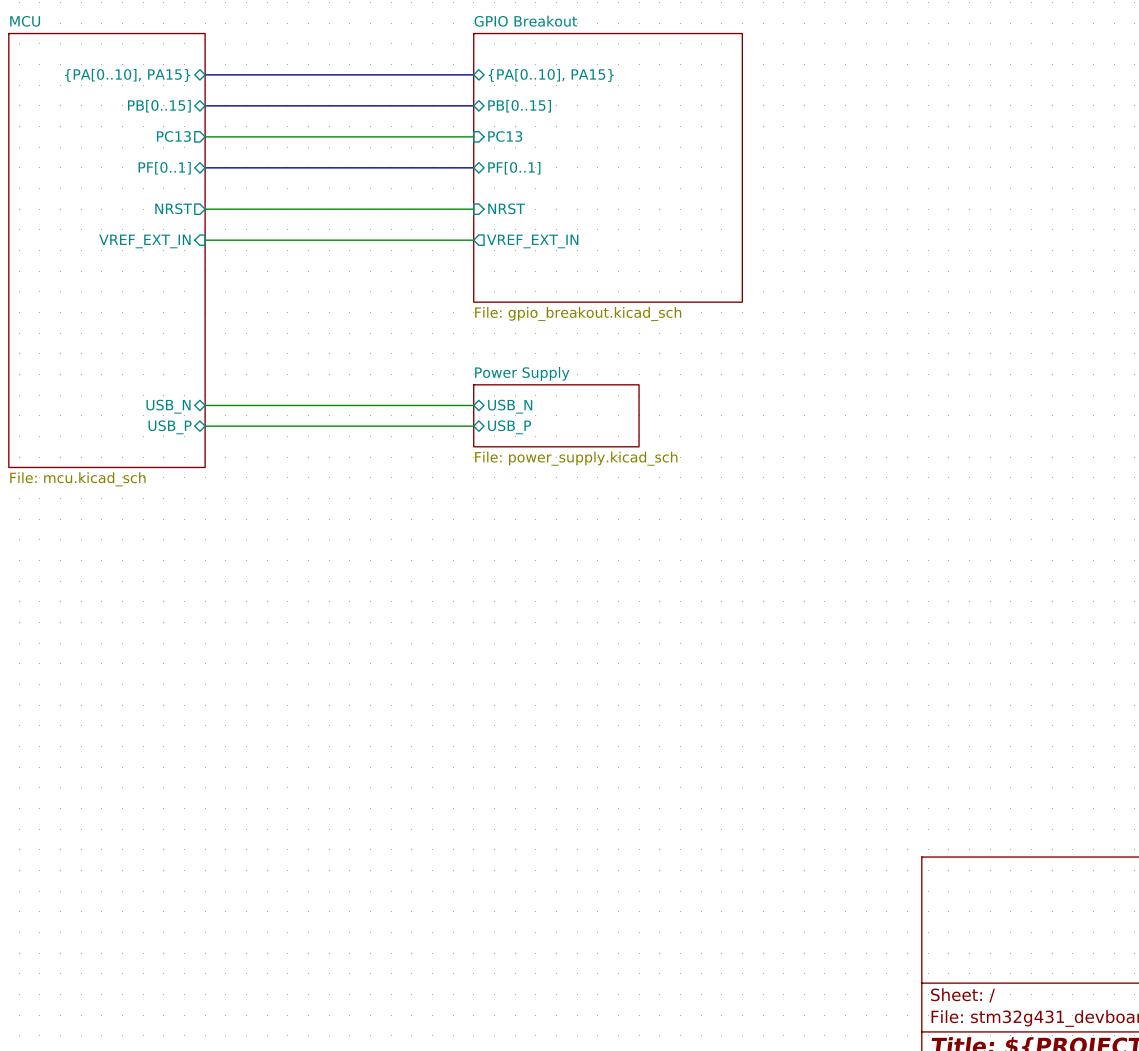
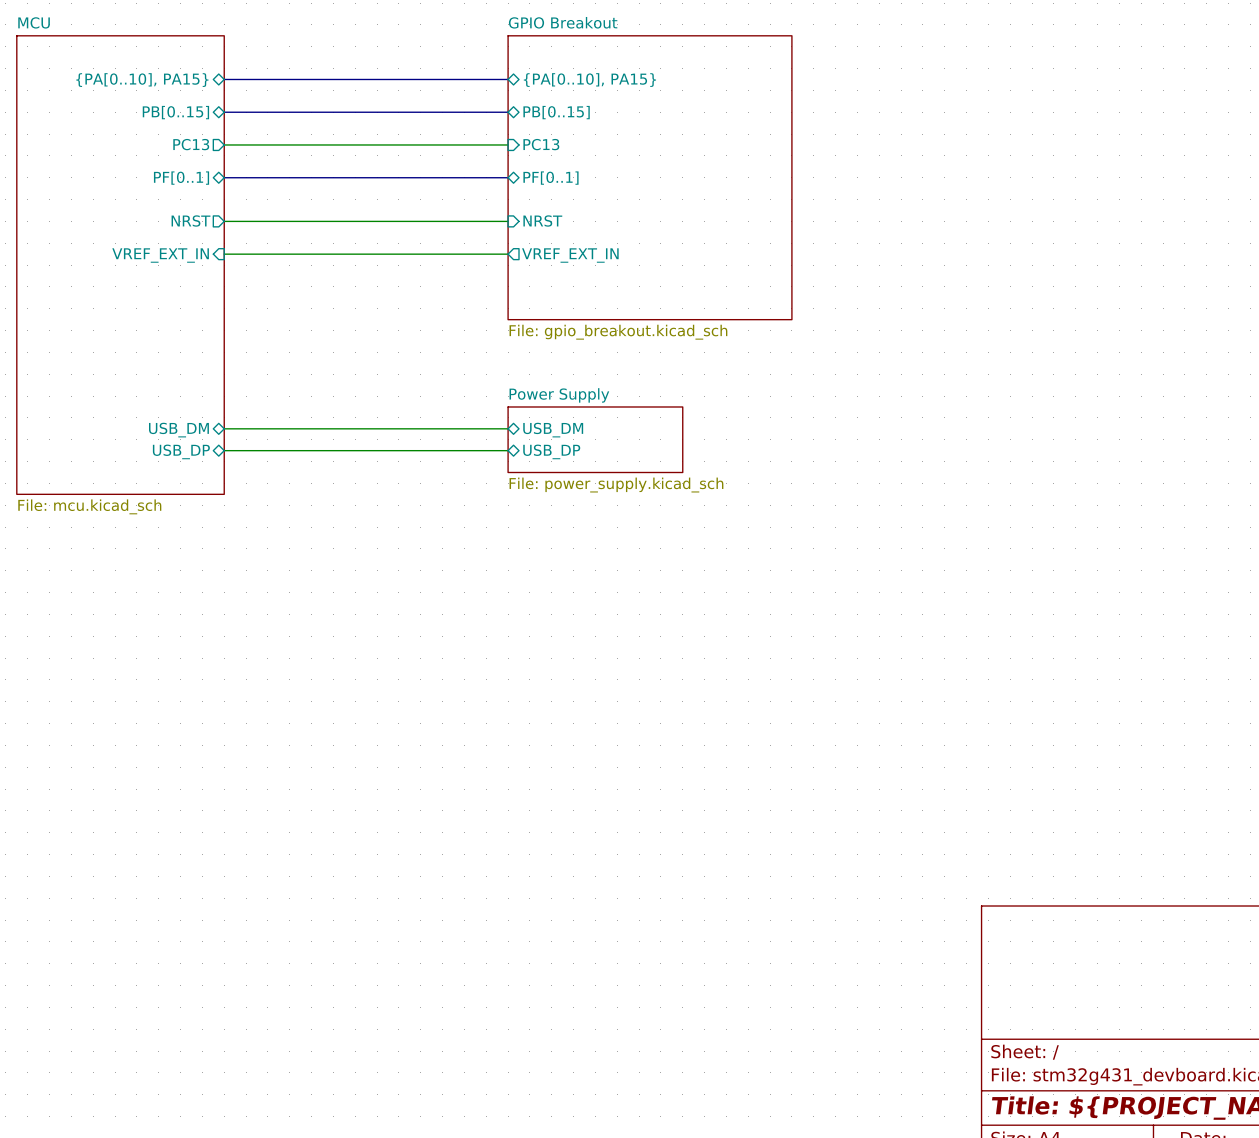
sheet pin: USB_N (168, 406) -> USB_DM (178, 430)
sheet pin: USB_N (510, 406) -> USB_DM (553, 430)
sheet pin: USB_P (170, 427) -> USB_DP (181, 451)
sheet pin: USB_P (509, 427) -> USB_DP (551, 451)

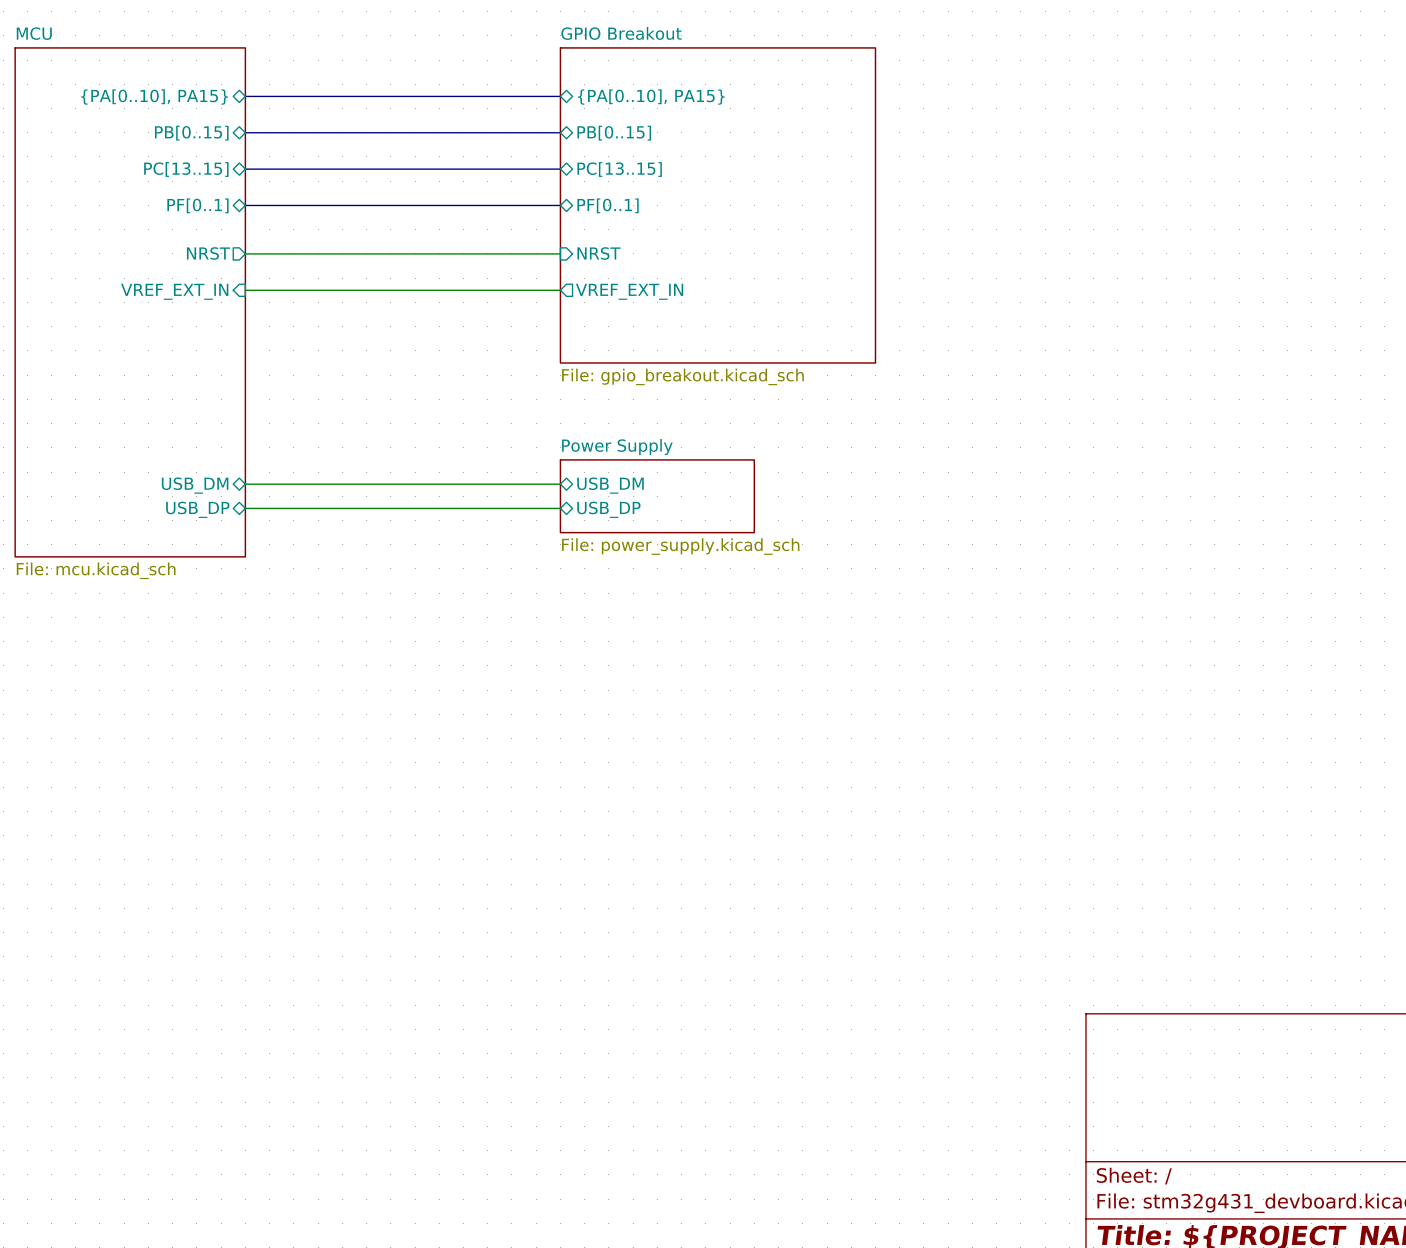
sheet pin shape: output (191, 144) -> bidirectional (186, 169)
sheet pin: PC13 (191, 144) -> PC[13..15] (186, 169)
bus: none -> (245, 169) (560, 169)
sheet pin shape: input (541, 144) -> bidirectional (619, 169)
sheet pin: PC13 (541, 144) -> PC[13..15] (619, 169)

